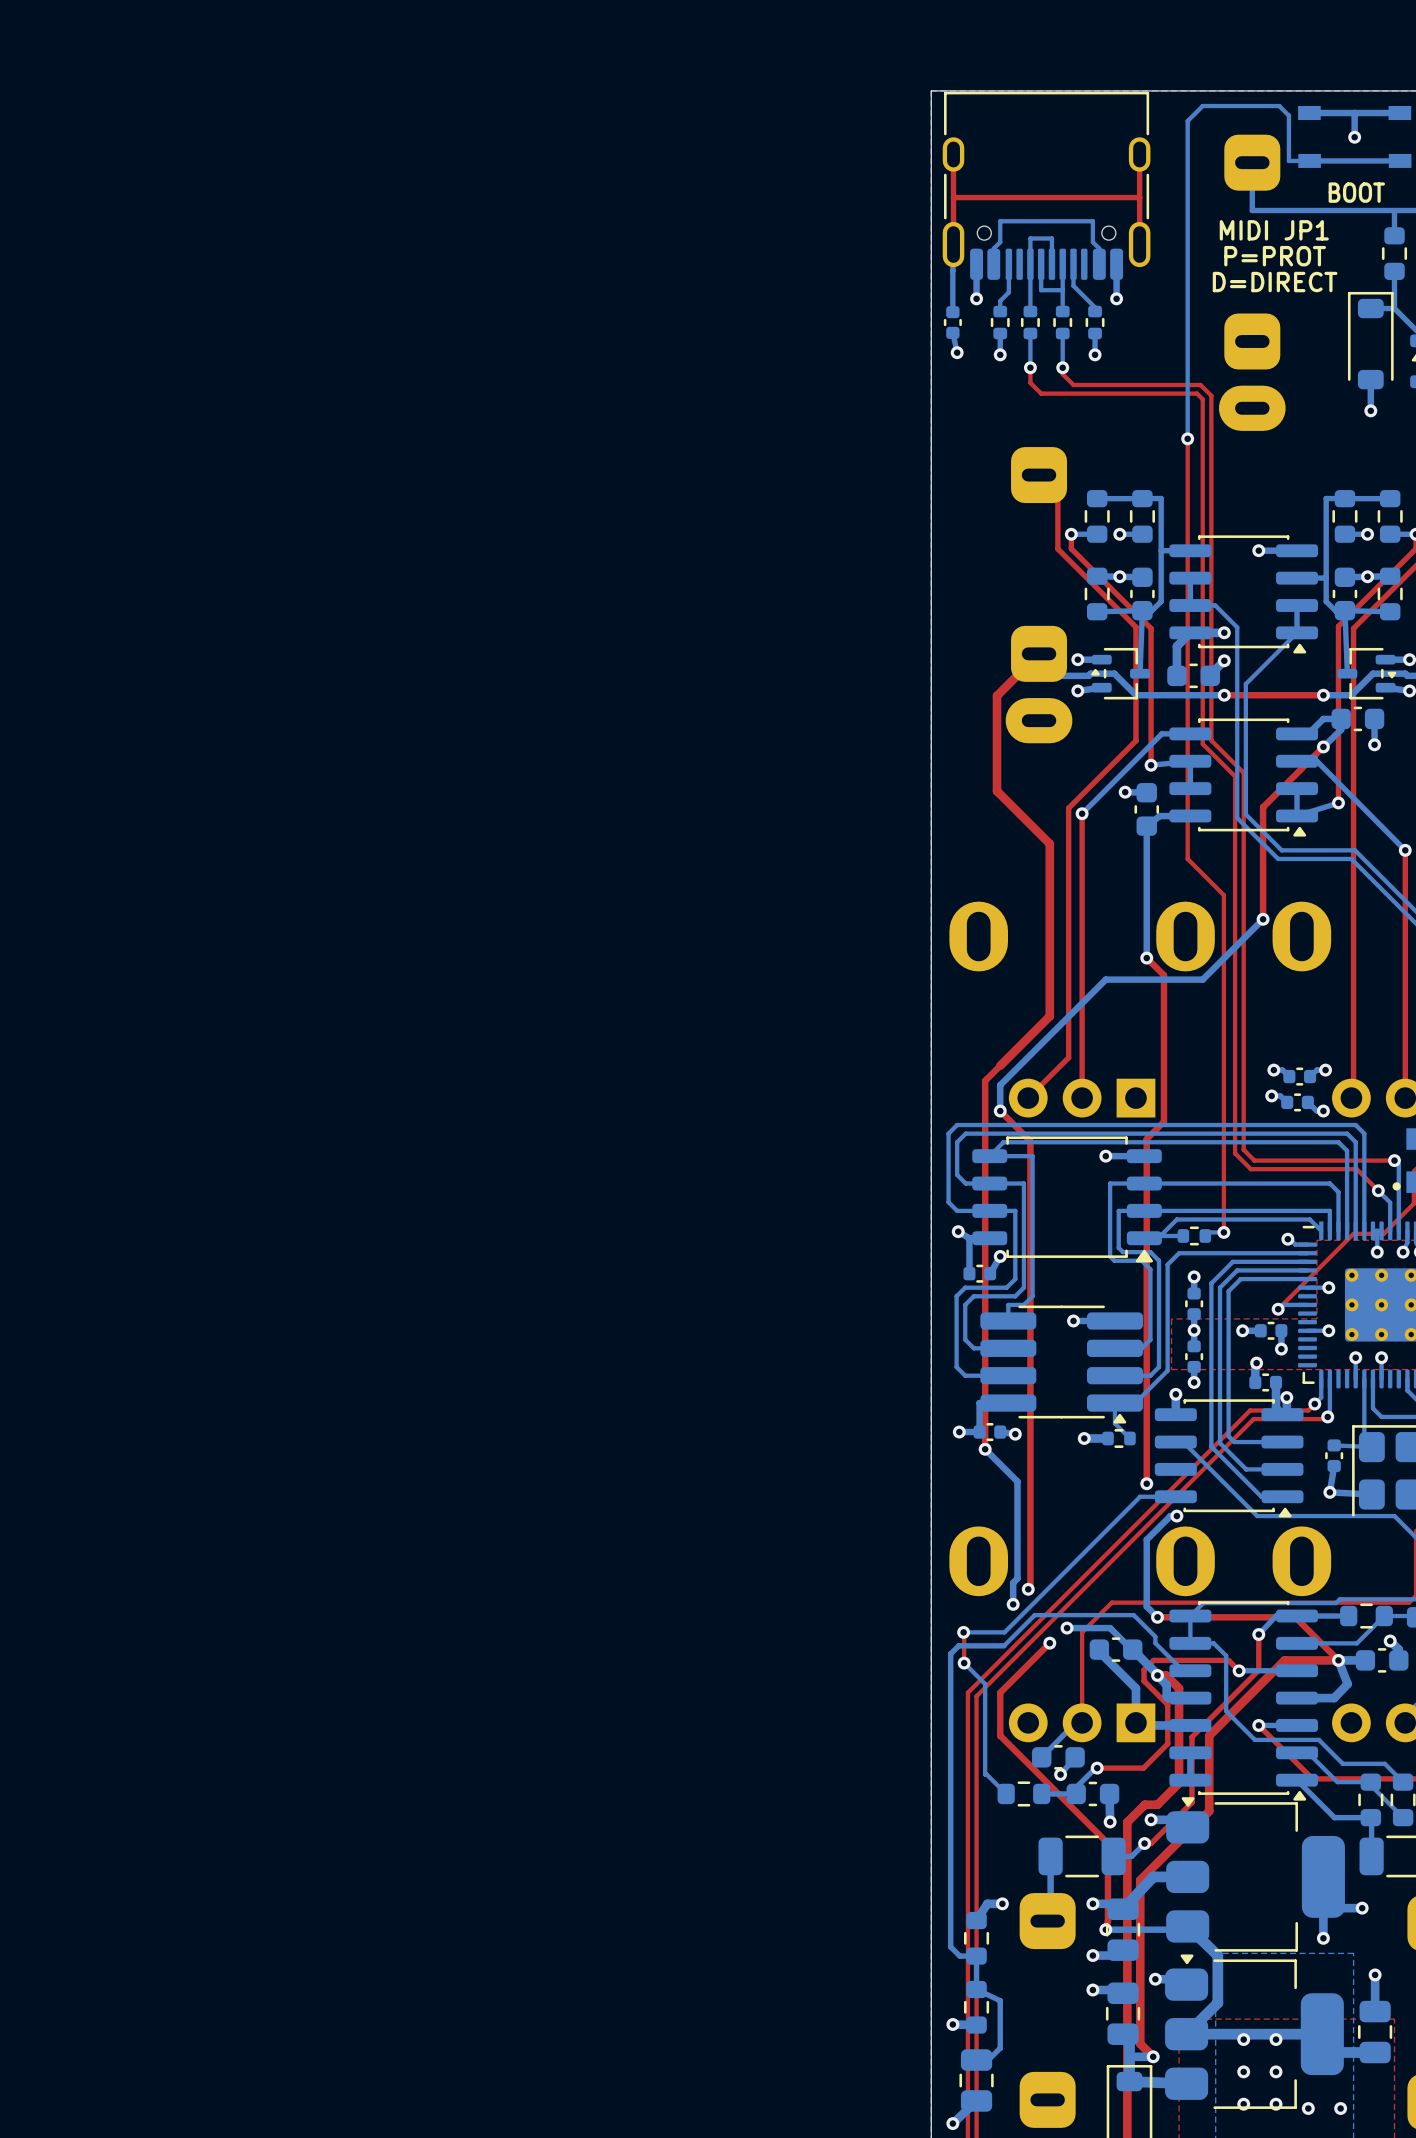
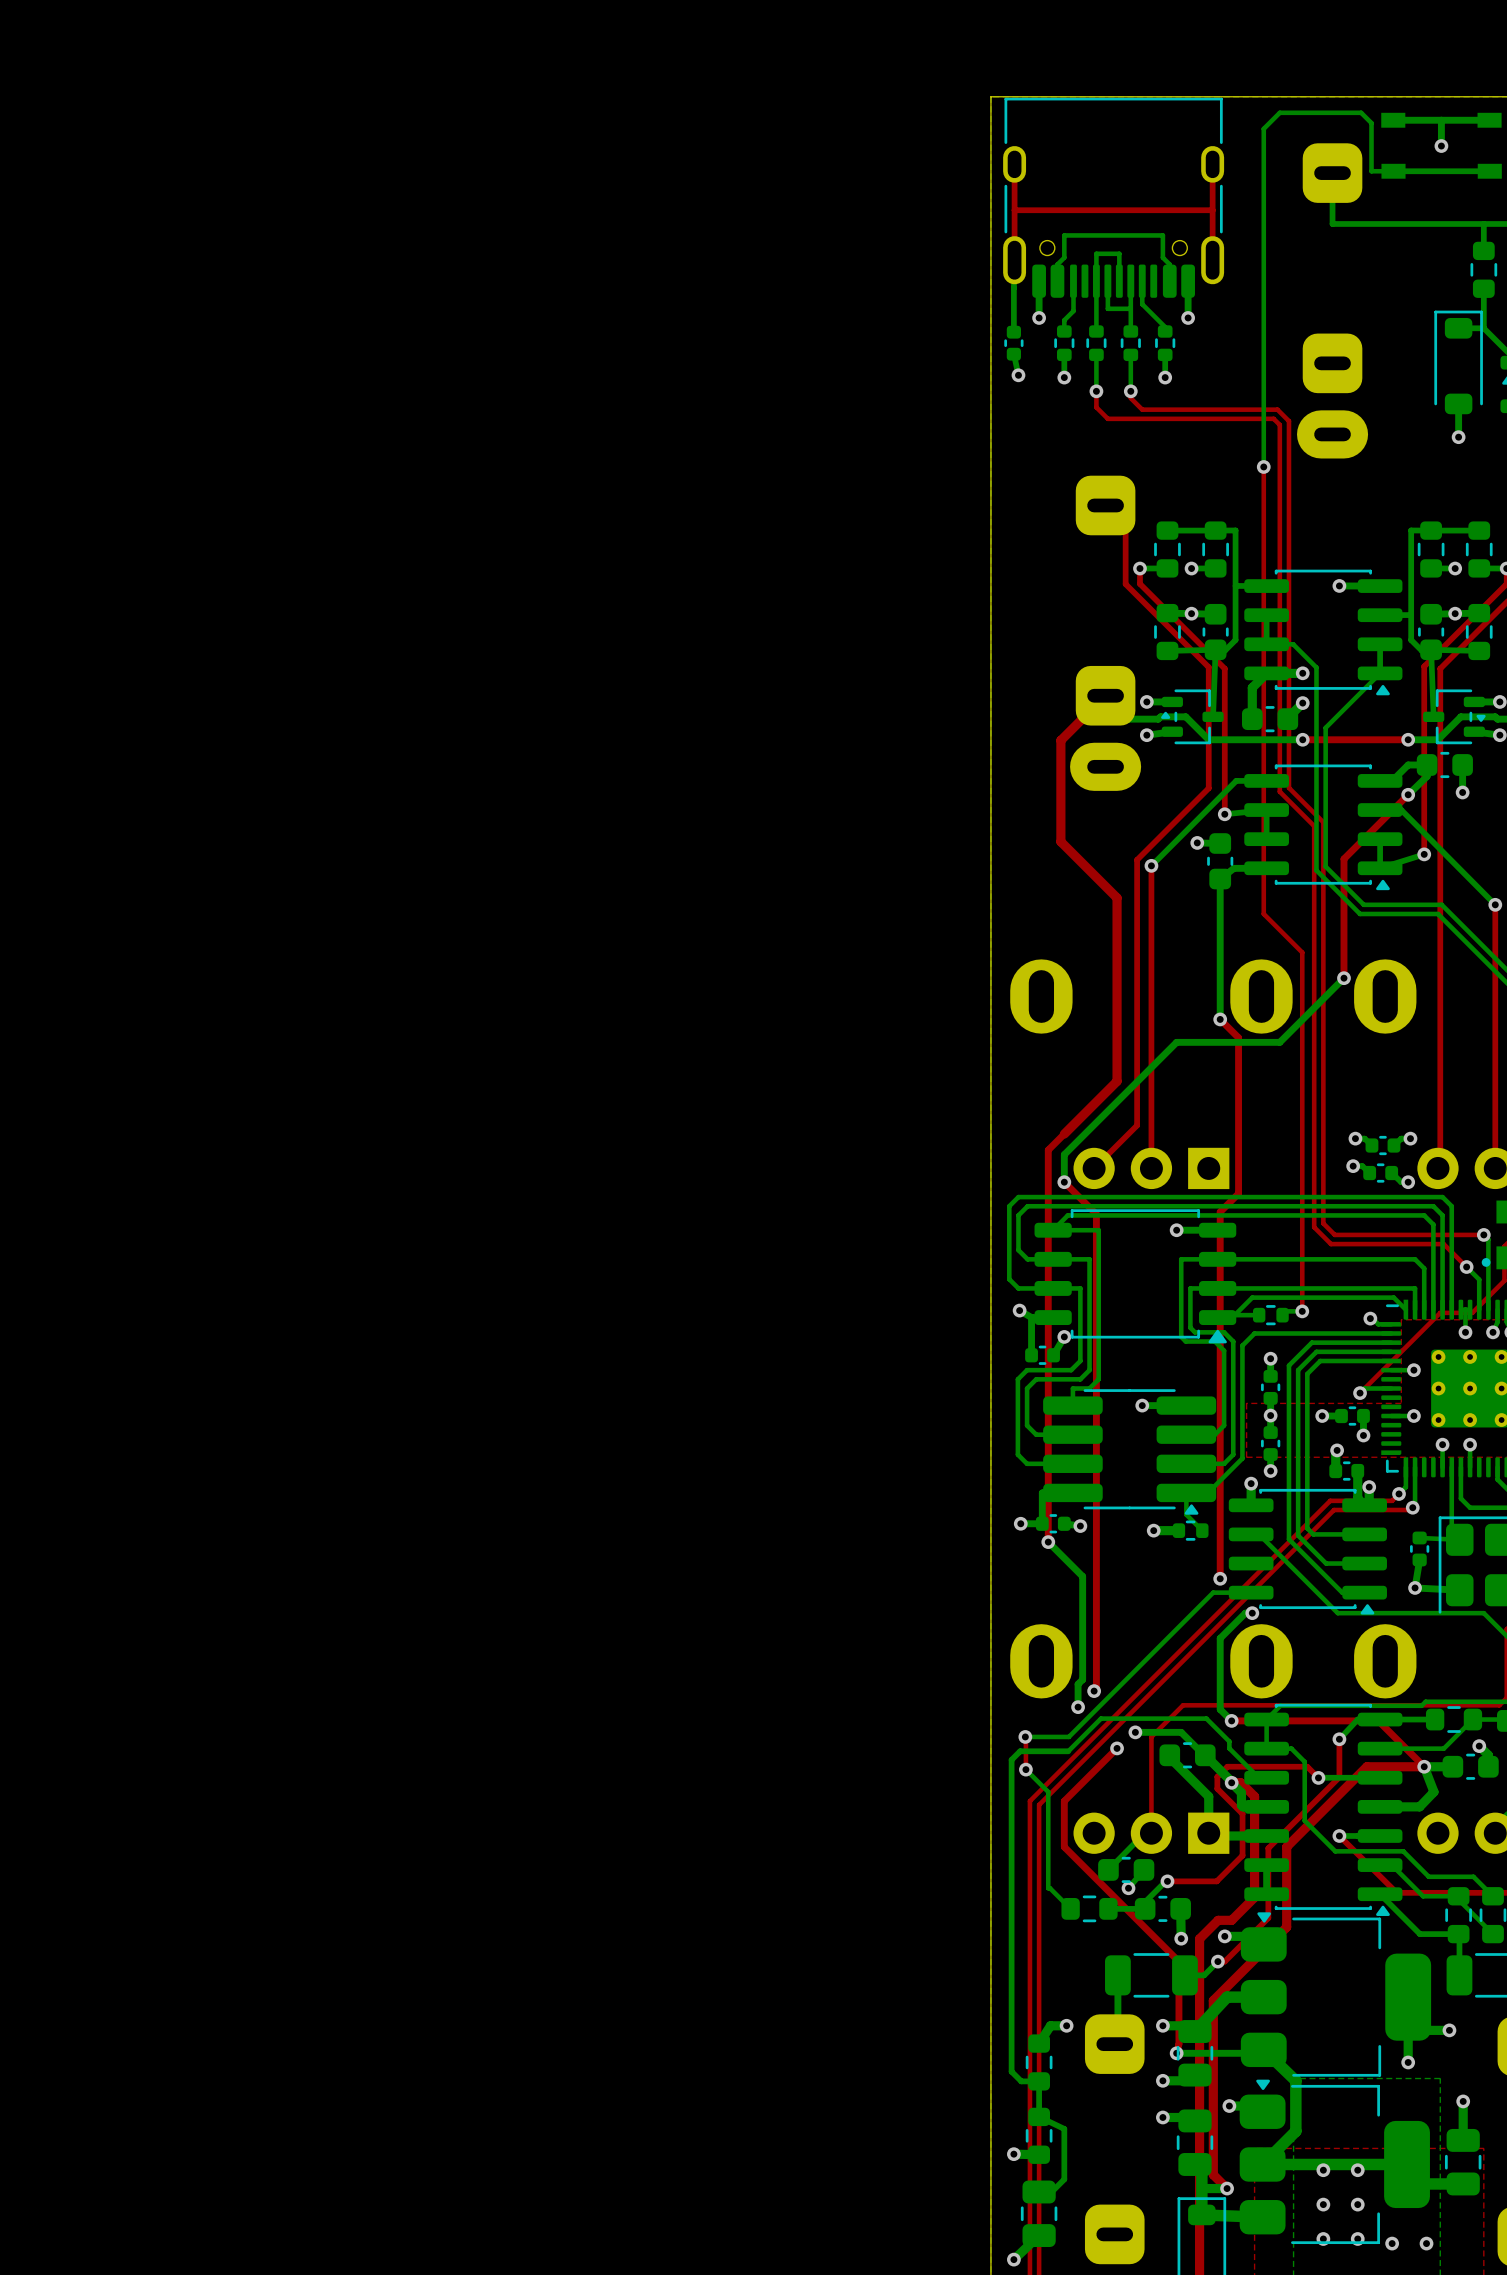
text: BOOT (1356, 192) -> none
text: MIDI JP1 (1274, 230) -> none
text: P=PROT (1275, 256) -> none
text: D=DIRECT (1275, 282) -> none

